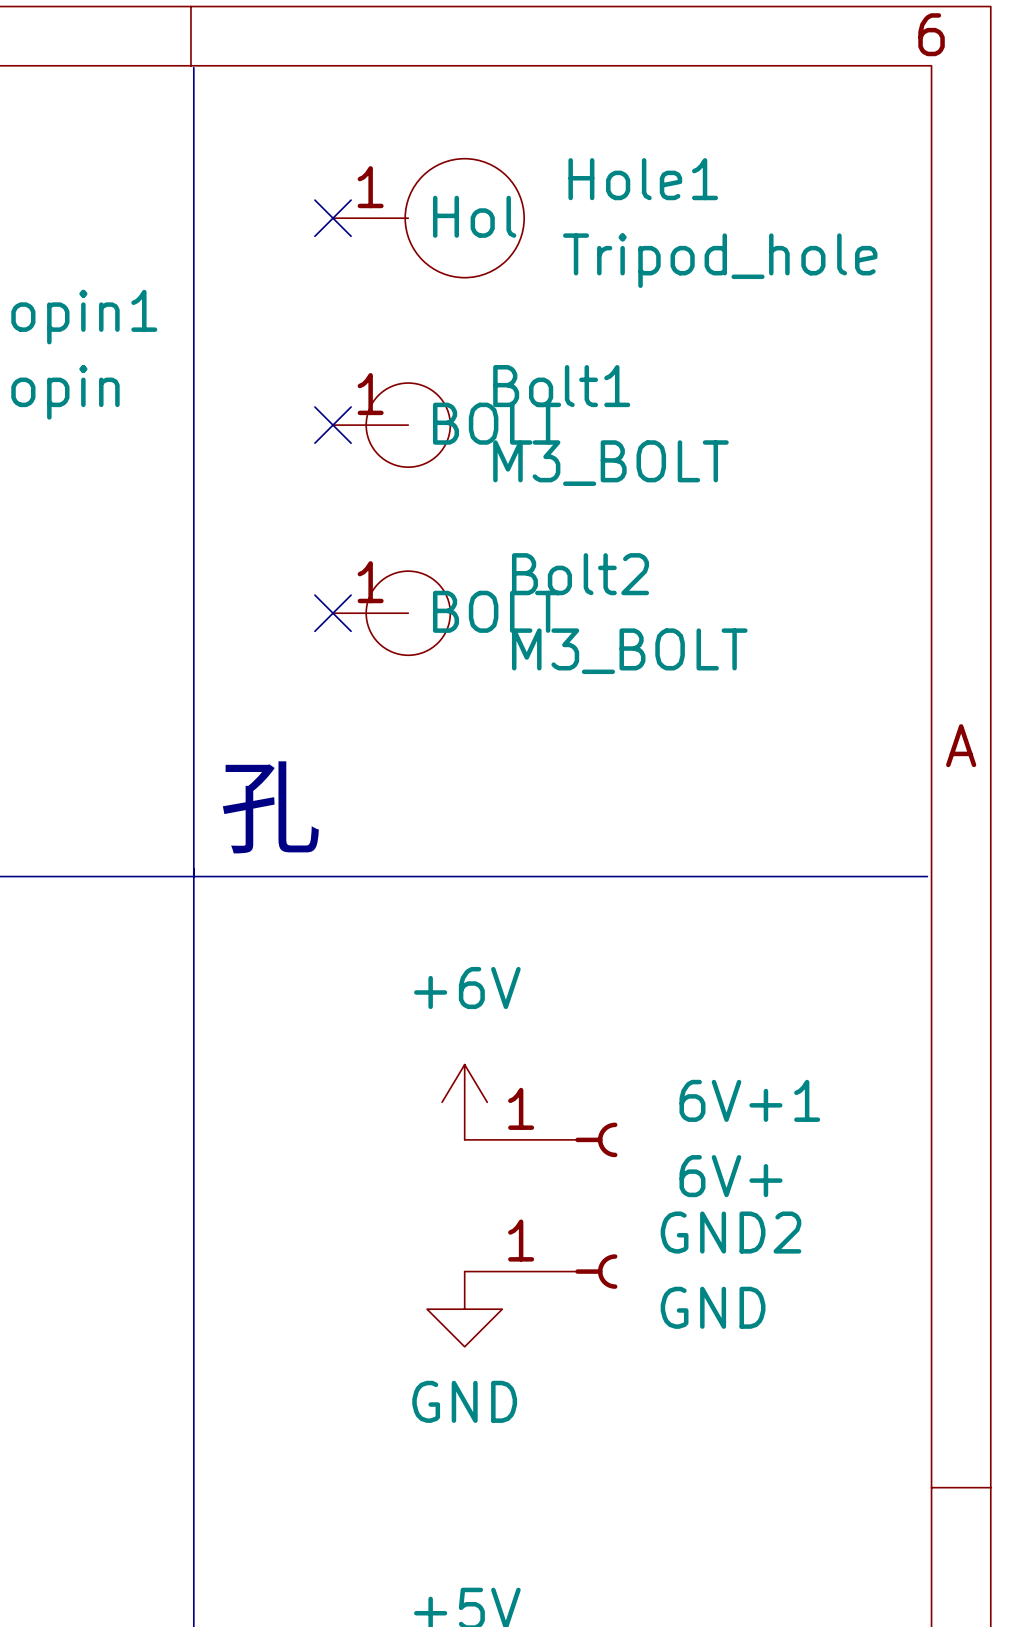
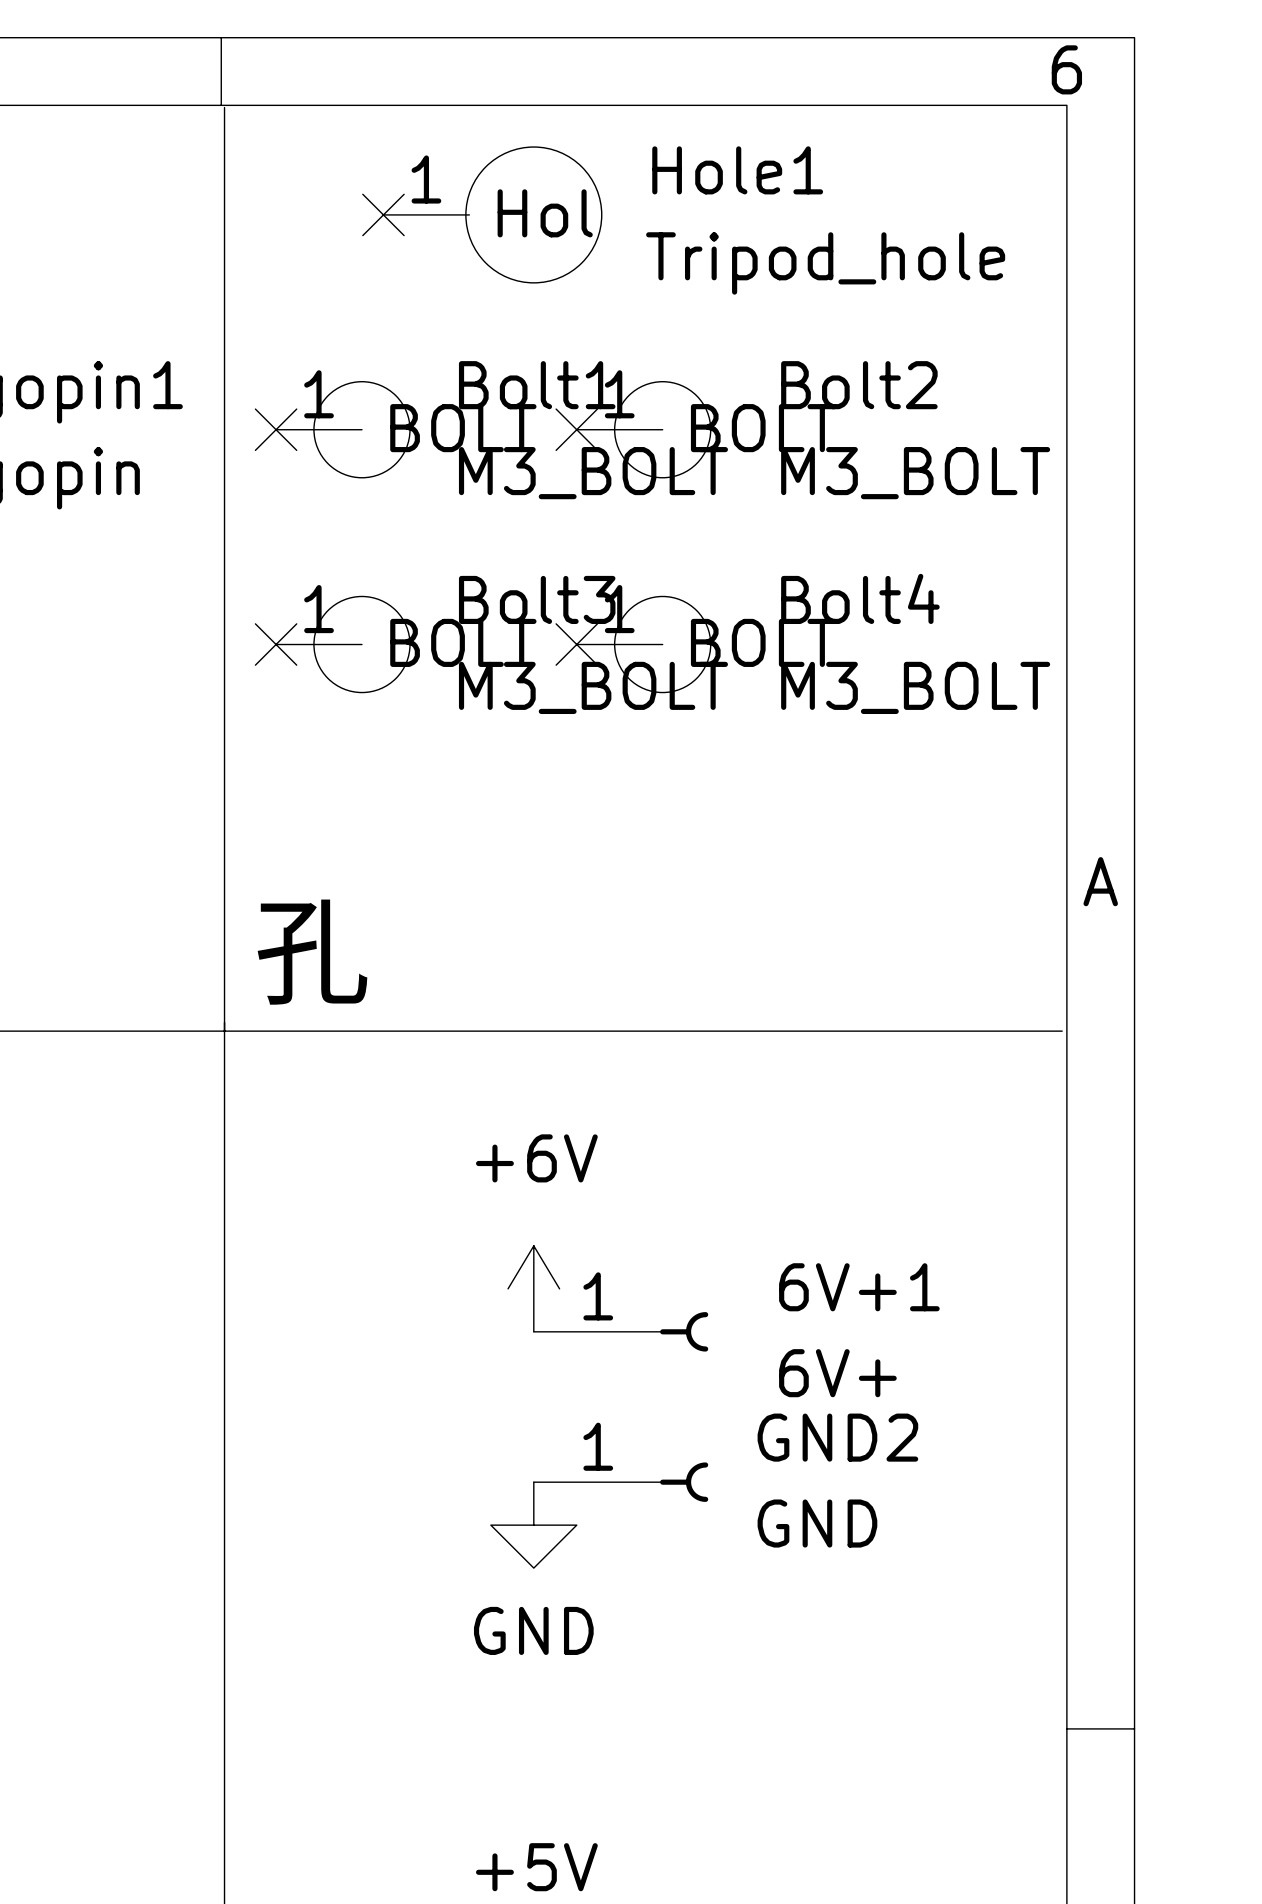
no-connect mark position: (333, 218) -> (383, 214)
Hole1 position: (428, 218) -> (492, 214)
no-connect mark: none -> (276, 429)
no-connect mark: none -> (576, 429)
no-connect mark: (333, 425) -> none
Bolt1 position: (391, 425) -> (343, 429)
no-connect mark: none -> (276, 644)
Bolt3: none -> M3_BOLT (343, 644)
no-connect mark: none -> (576, 644)
Bolt4: none -> M3_BOLT (643, 644)
no-connect mark: (333, 613) -> none
Bolt2 position: (391, 613) -> (643, 429)

